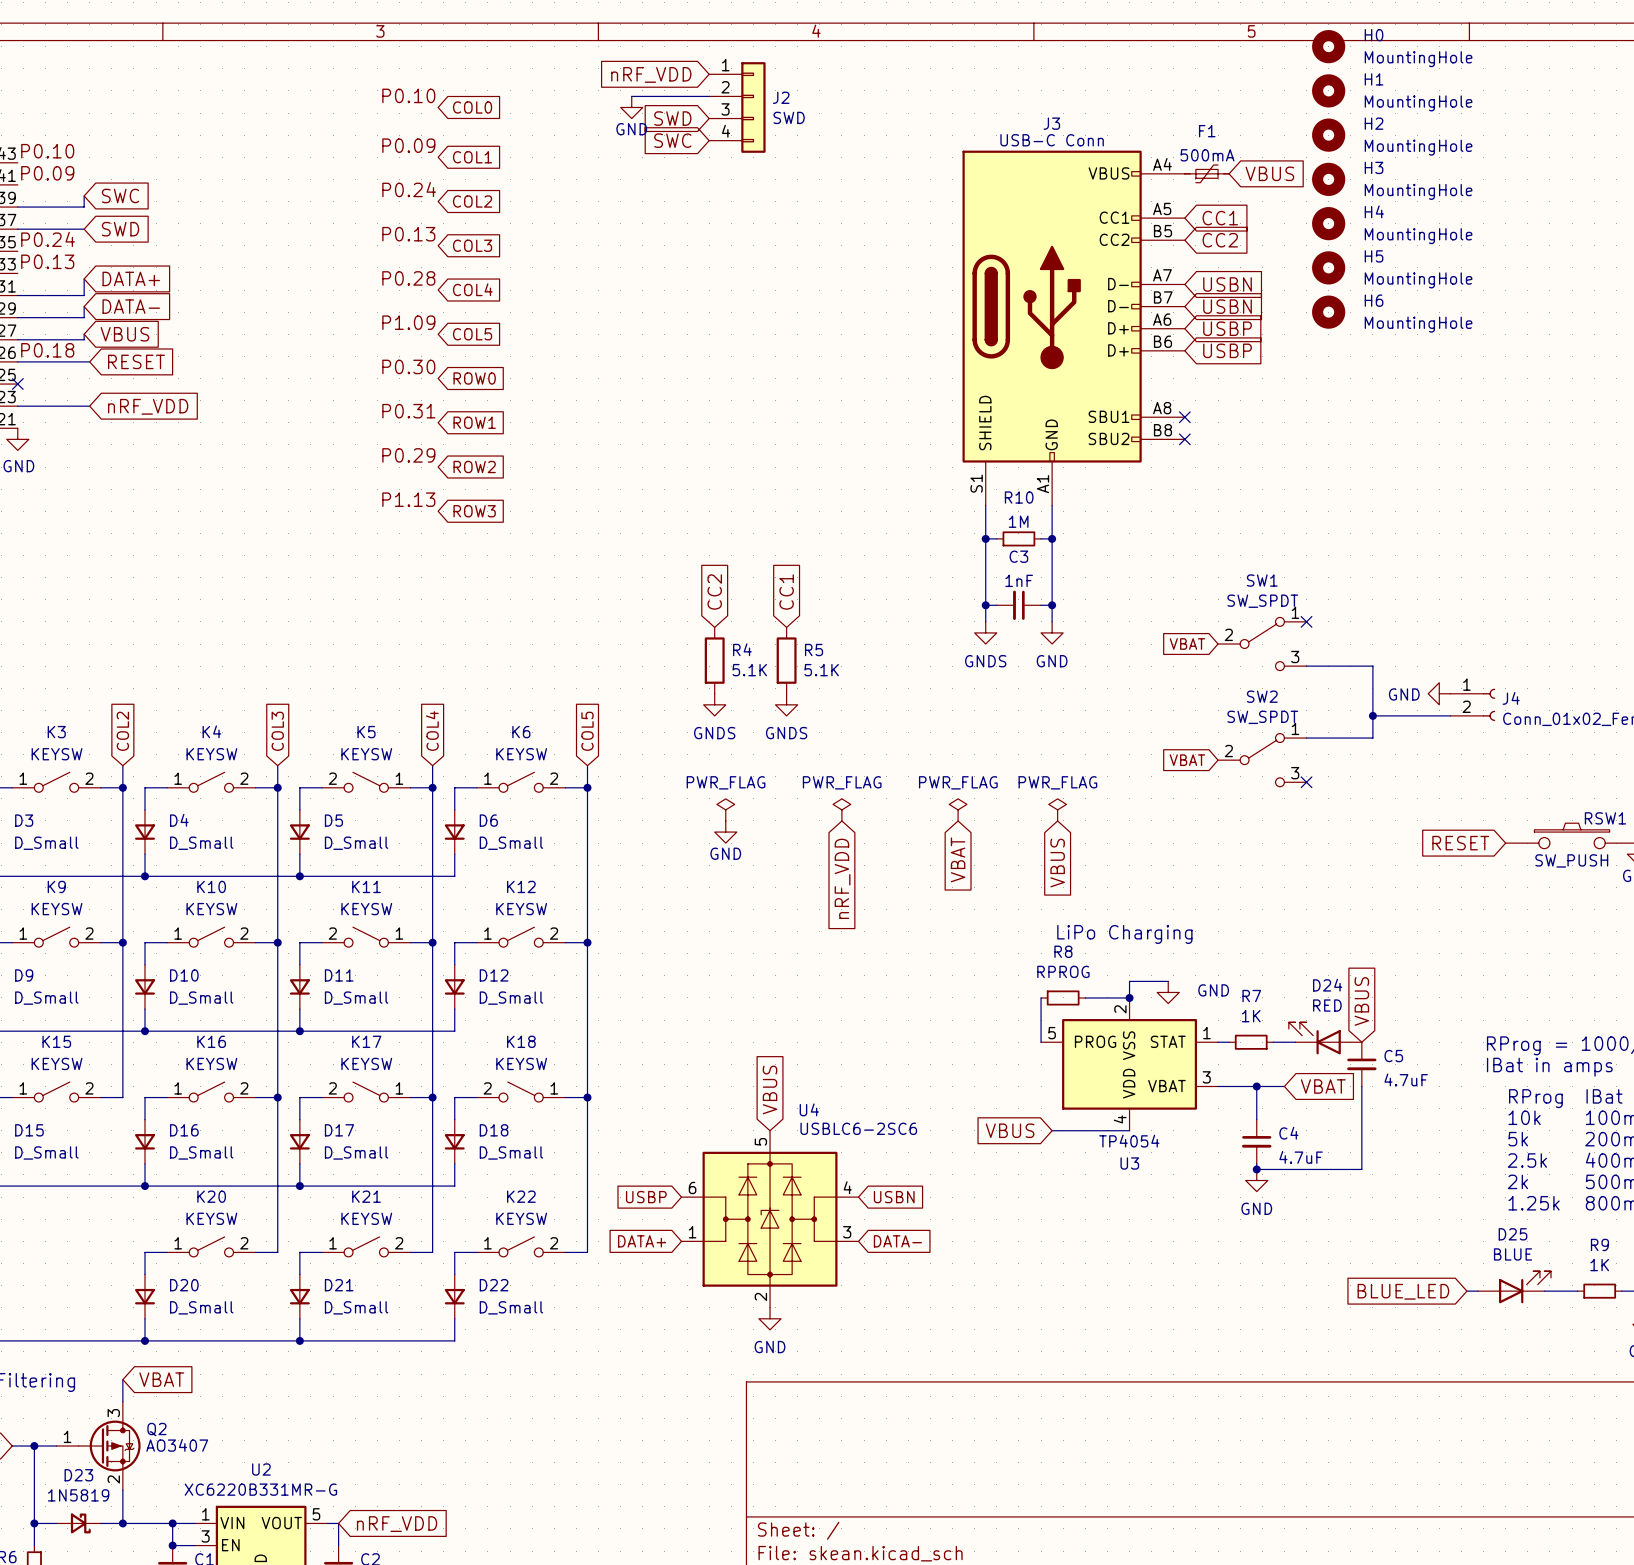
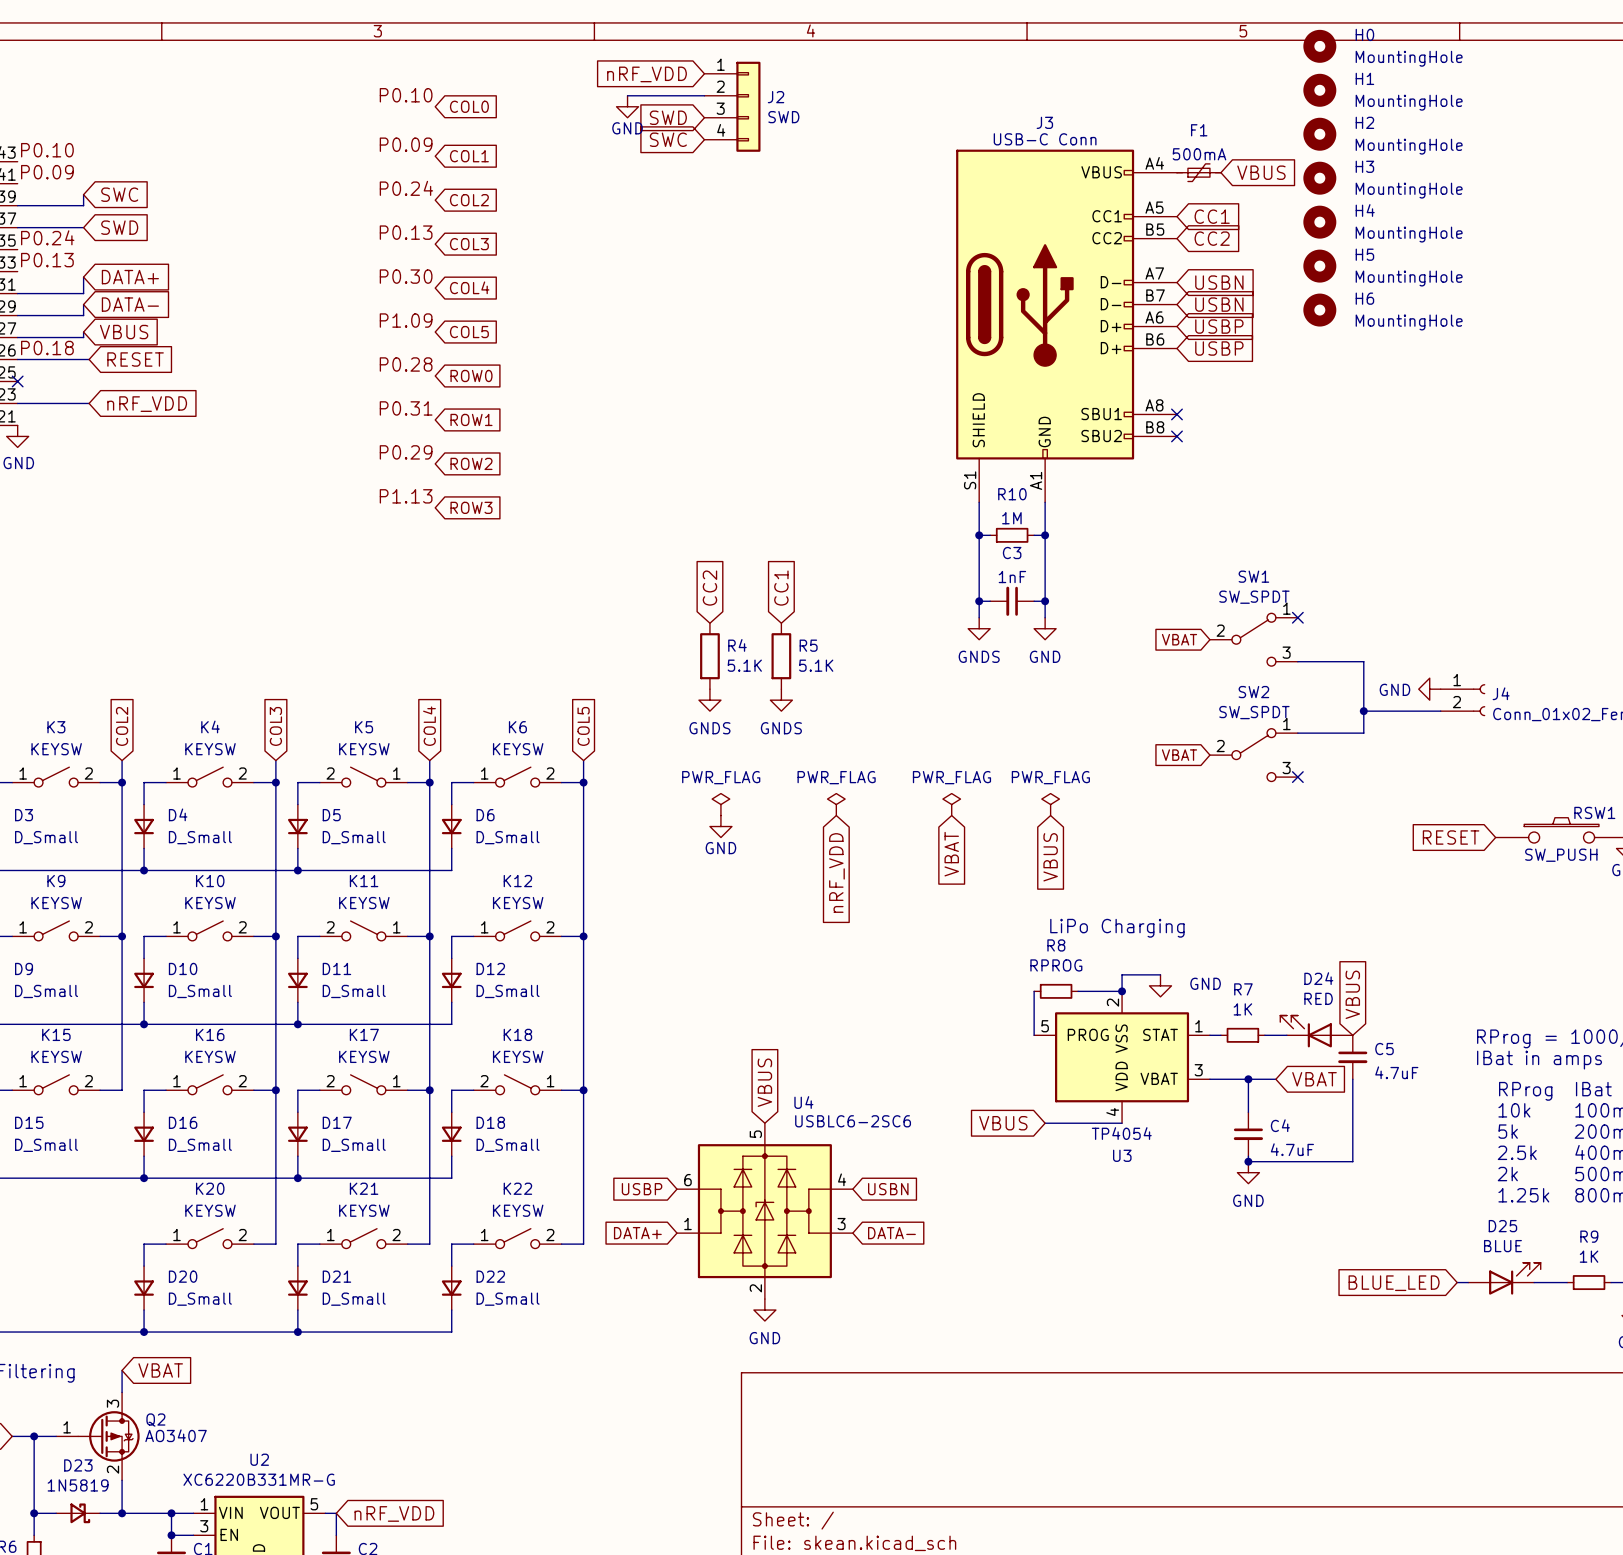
label: P0.28 (408, 278) -> P0.30 (406, 276)
label: P0.30 (408, 366) -> P0.28 (406, 364)

